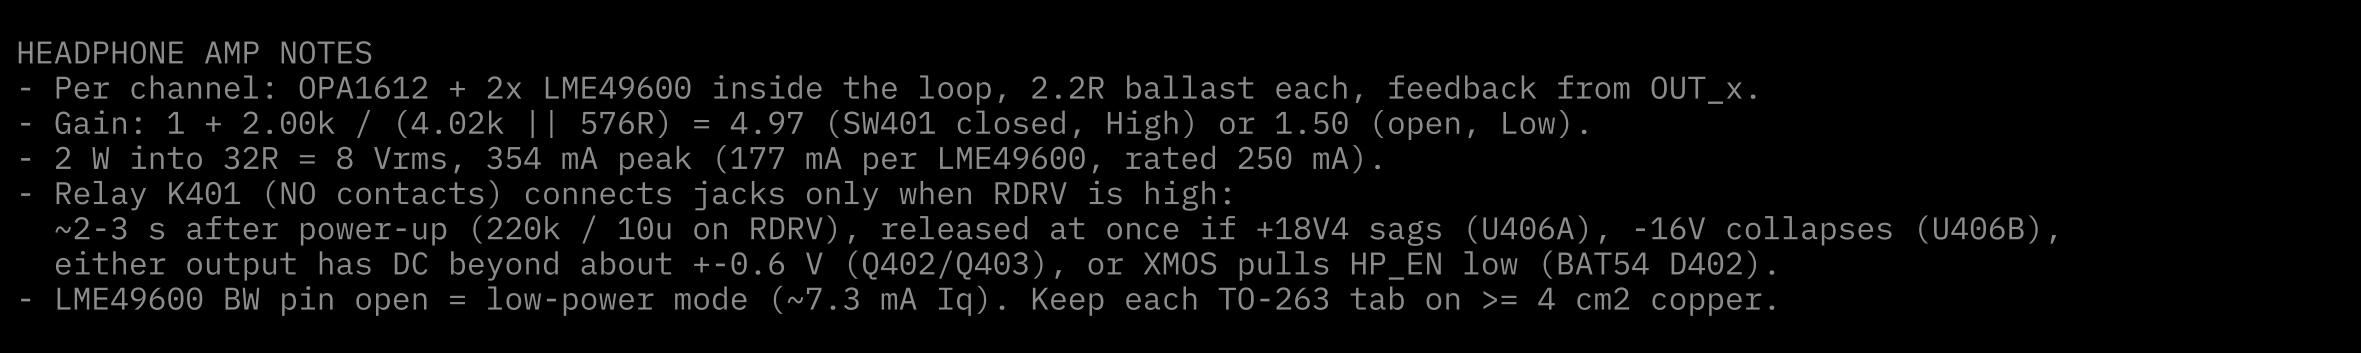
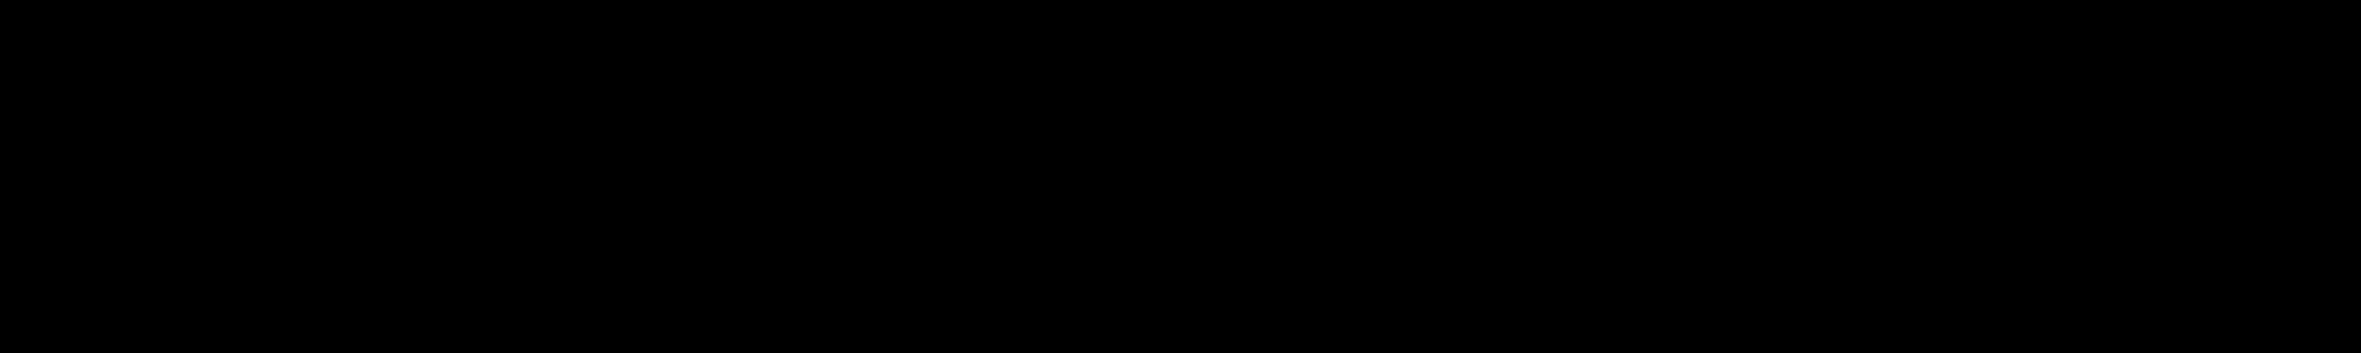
text: HEADPHONE AMP NOTES (194, 52) -> none
text: - Per channel: OPA1612 + 2x LME49600 inside the loop, 2.2R ballast each, feedback from OUT_x. (888, 90) -> none
text: - Gain: 1 + 2.00k / (4.02k || 576R) = 4.97 (SW401 closed, High) or 1.50 (open, Low). (803, 125) -> none
text: - 2 W into 32R = 8 Vrms, 354 mA peak (177 mA per LME49600, rated 250 mA). (700, 160) -> none
text: - Relay K401 (NO contacts) connects jacks only when RDRV is high: (625, 195) -> none
text: ~2-3 s after power-up (220k / 10u on RDRV), released at once if +18V4 sags (U406A), -16V collapses (U406B), (1055, 230) -> none
text: either output has DC beyond about +-0.6 V (Q402/Q403), or XMOS pulls HP_EN low (BAT54 D402). (915, 265) -> none
text: - LME49600 BW pin open = low-power mode (~7.3 mA Iq). Keep each TO-263 tab on >= 4 cm2 copper. (897, 300) -> none

